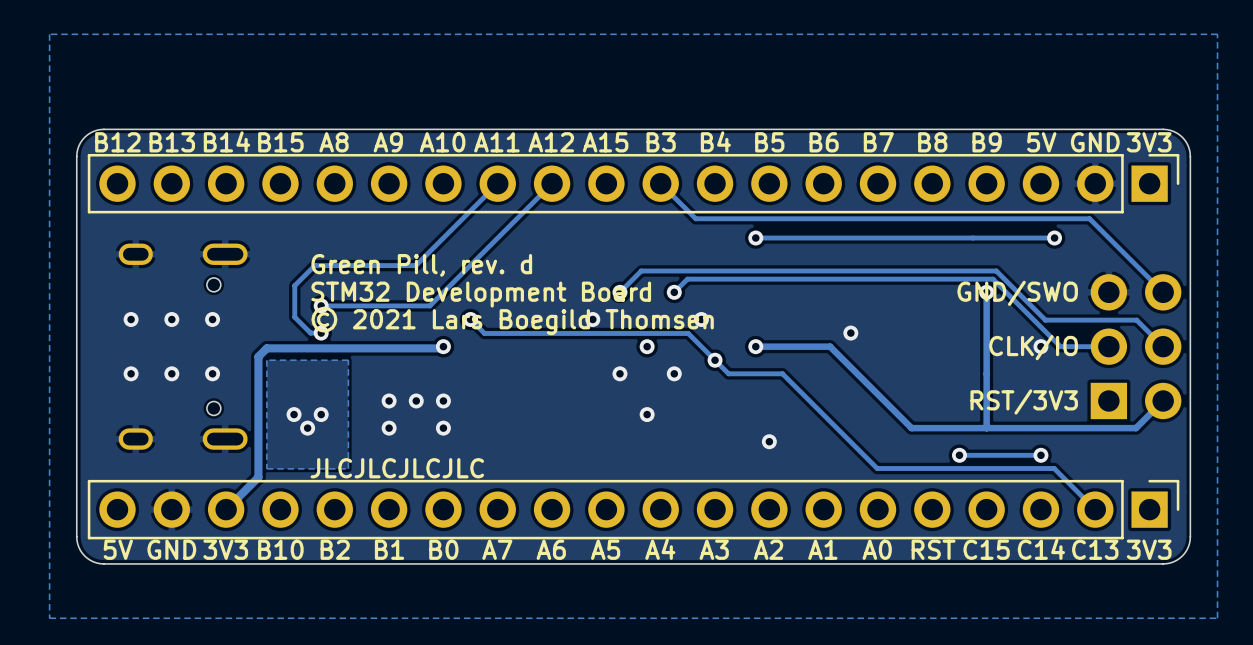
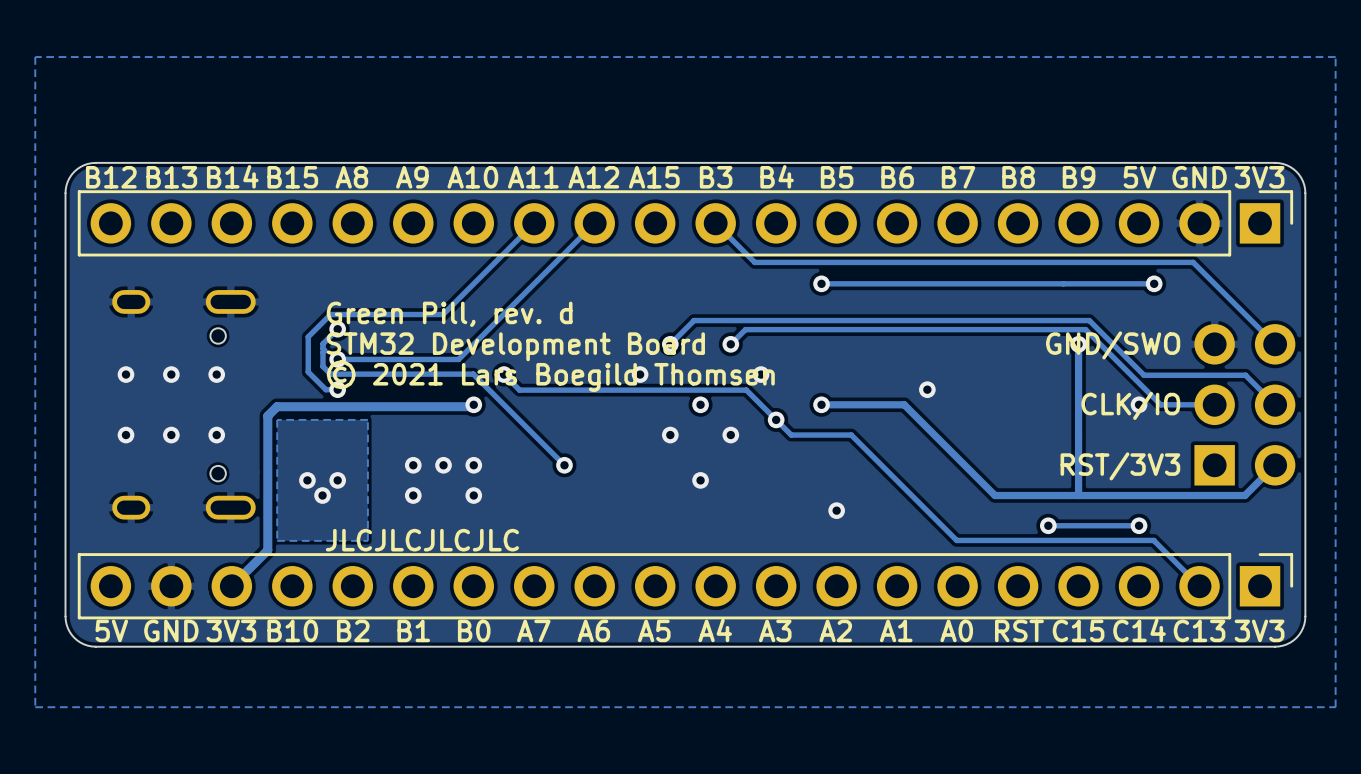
track: none -> (337, 329) (322, 343) (324, 350) (322, 352) (322, 366) (330, 374) (473, 374) (564, 465)
via: none -> (337, 329)
via: none -> (564, 465)

